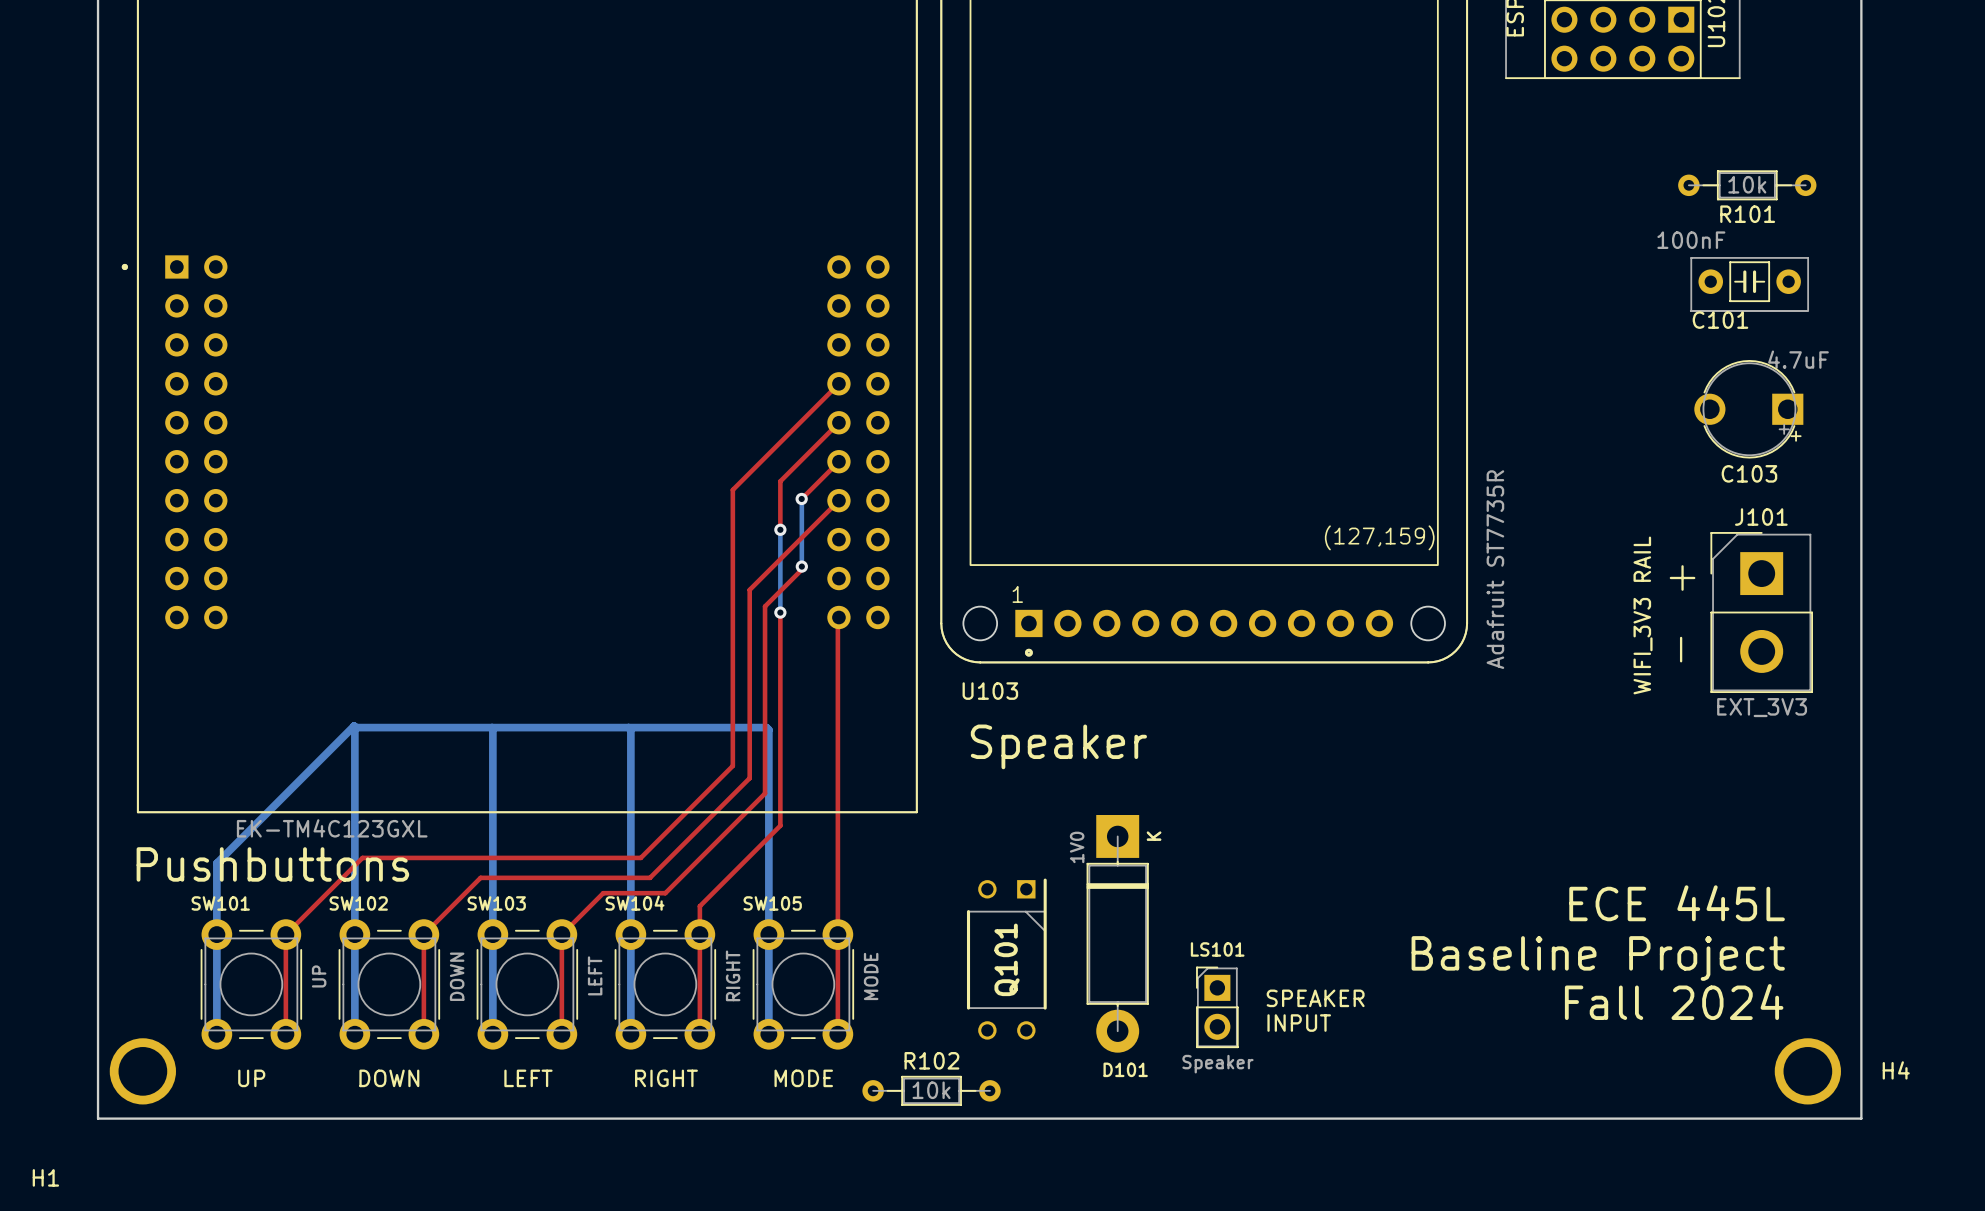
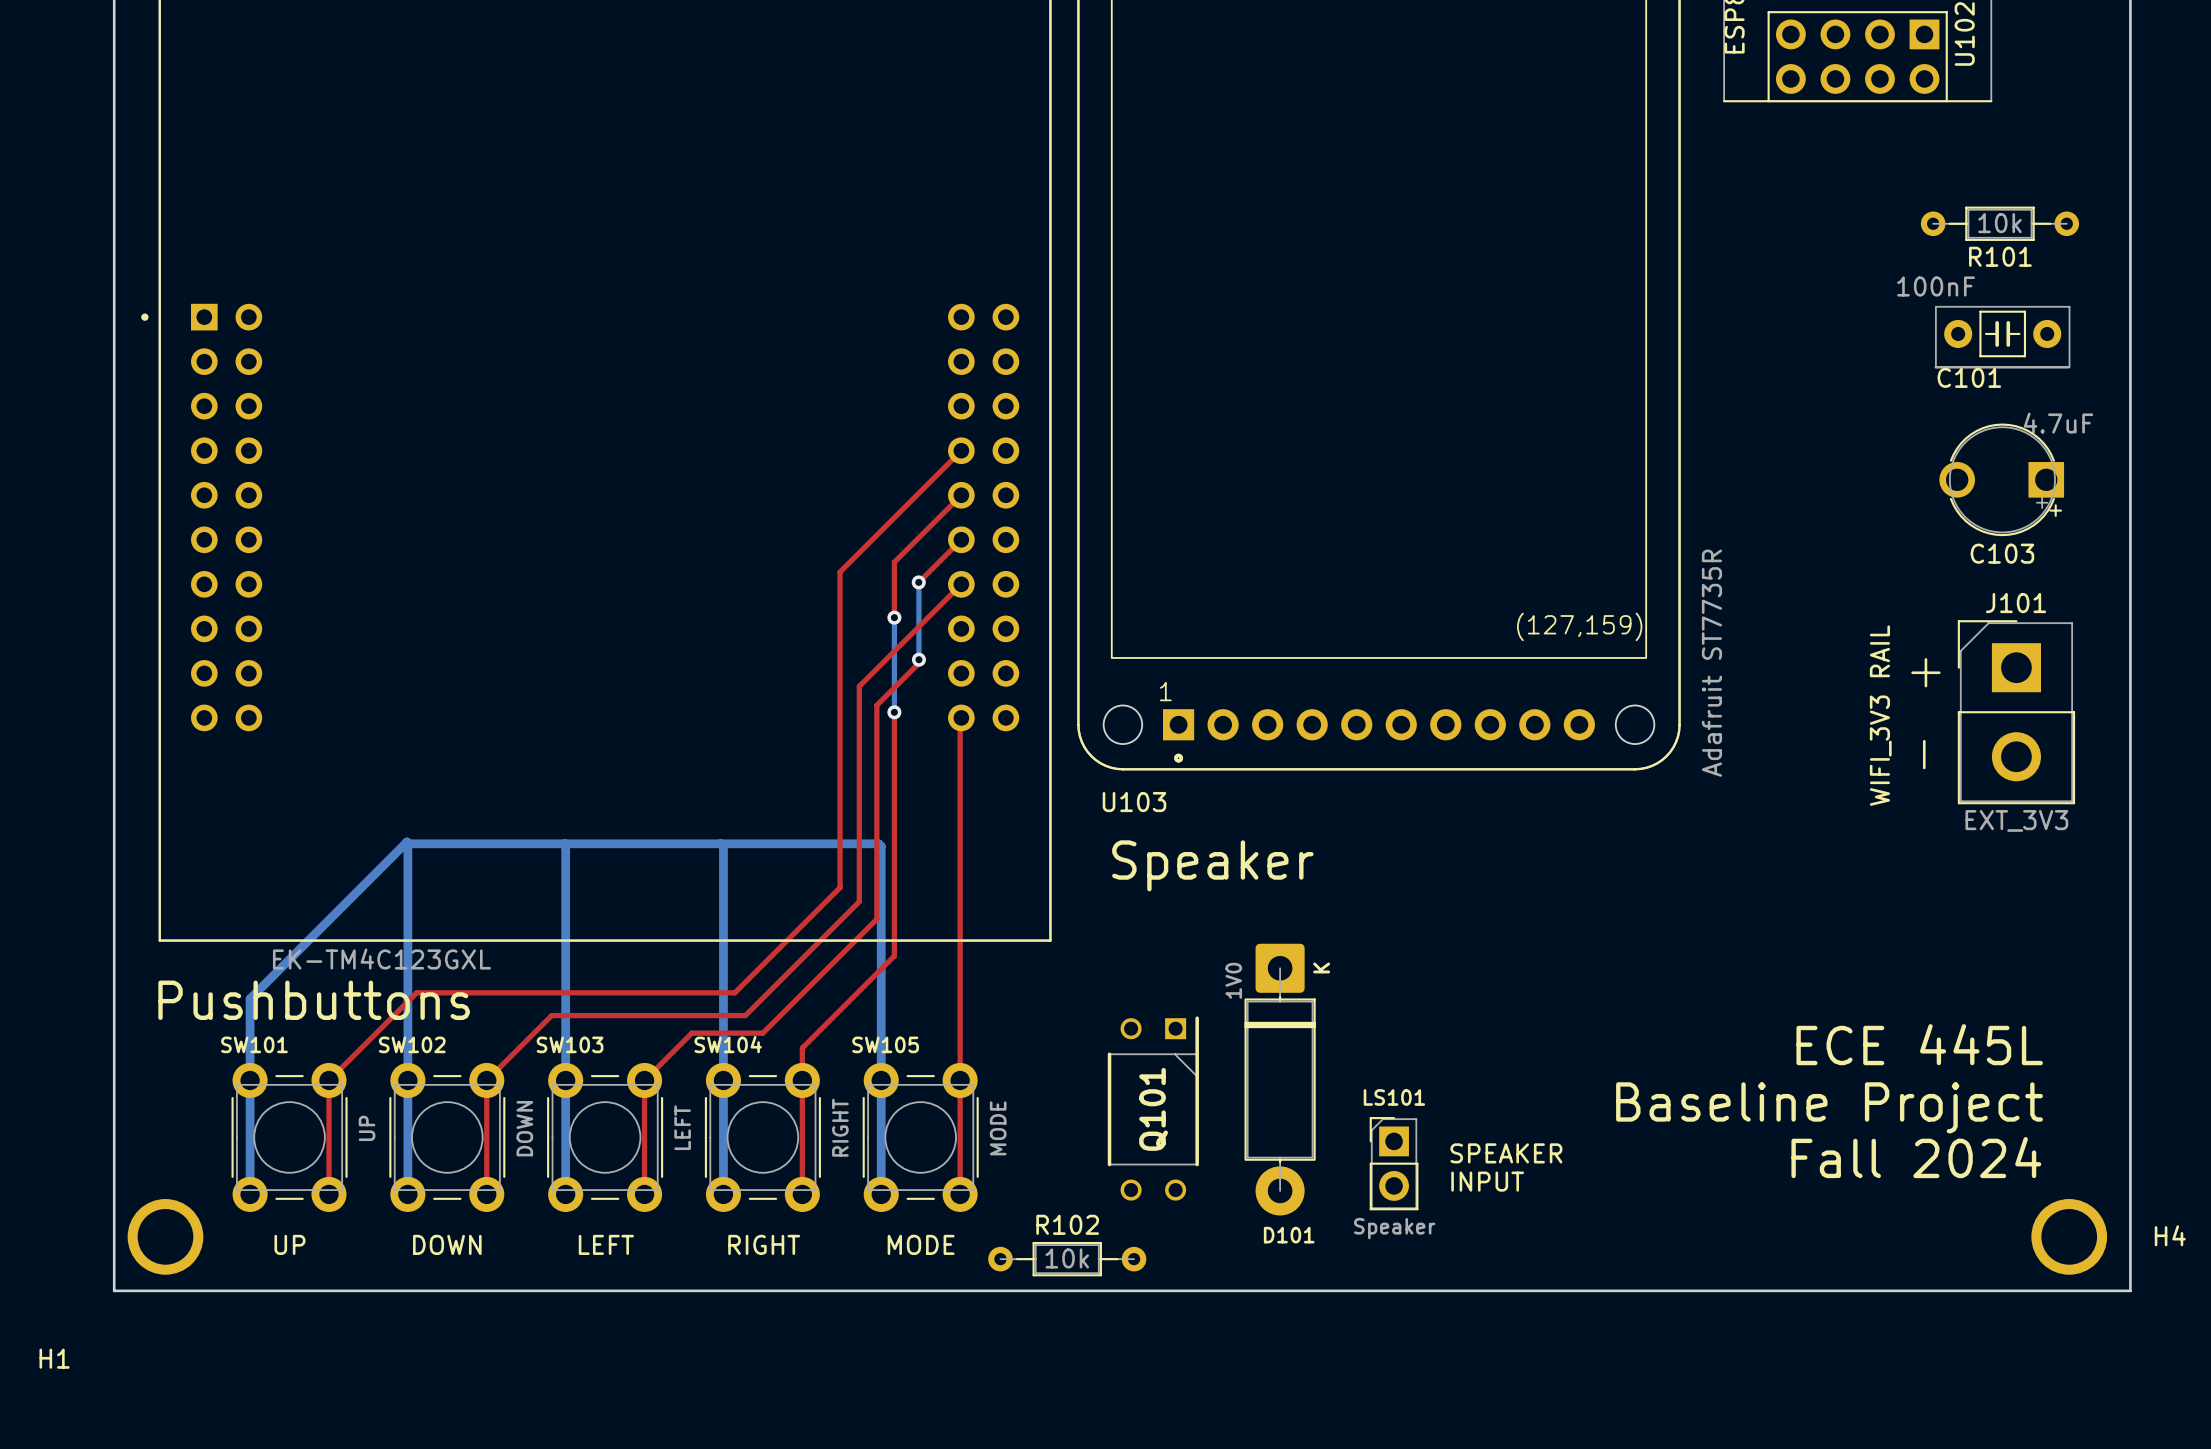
D101 footprint: [1086, 814, 1149, 1053] -> [1244, 943, 1316, 1216]

